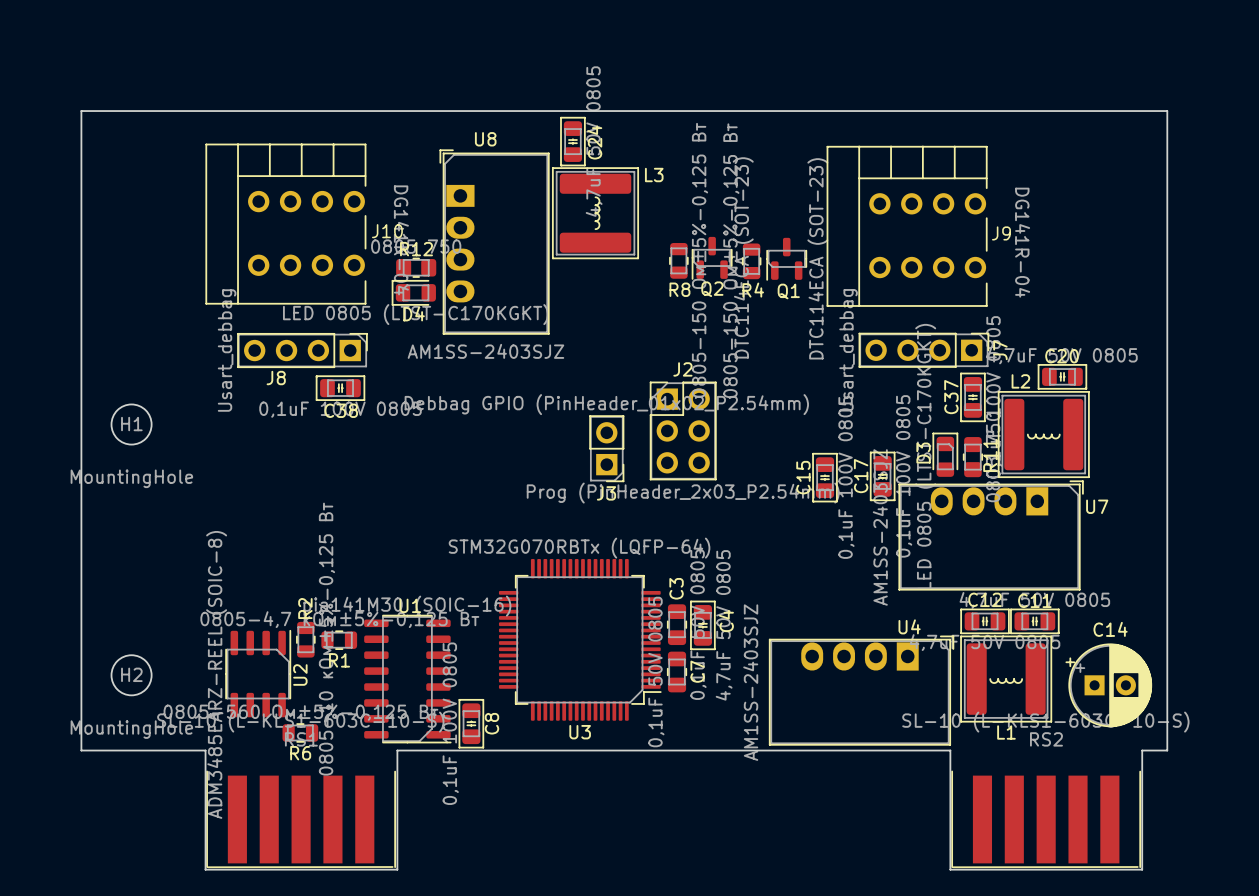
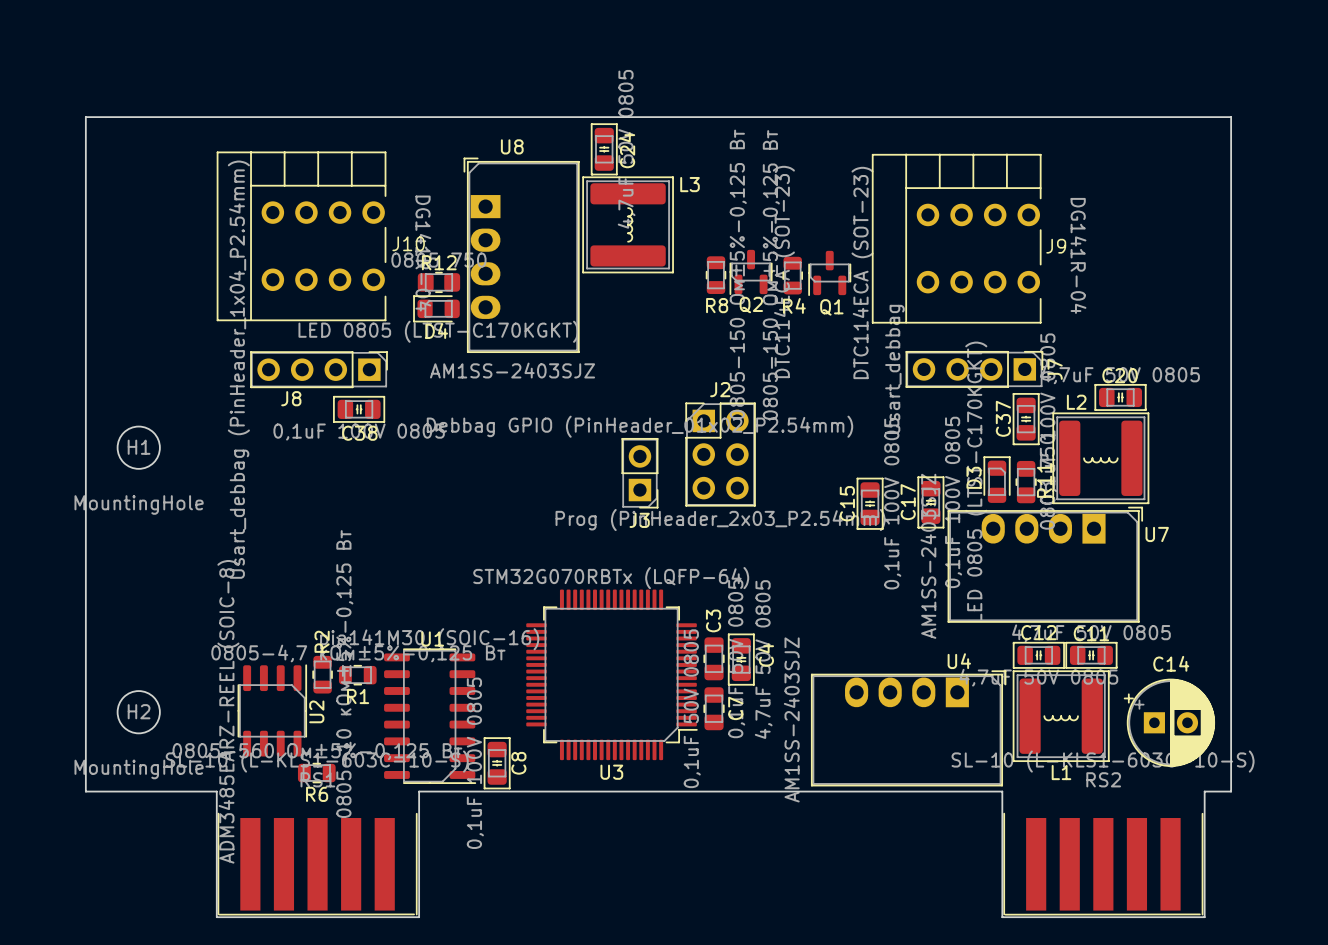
J8 value: Usart_debbag (227, 350) -> Usart_debbag (PinHeader_1x04_P2.54mm) (238, 369)

